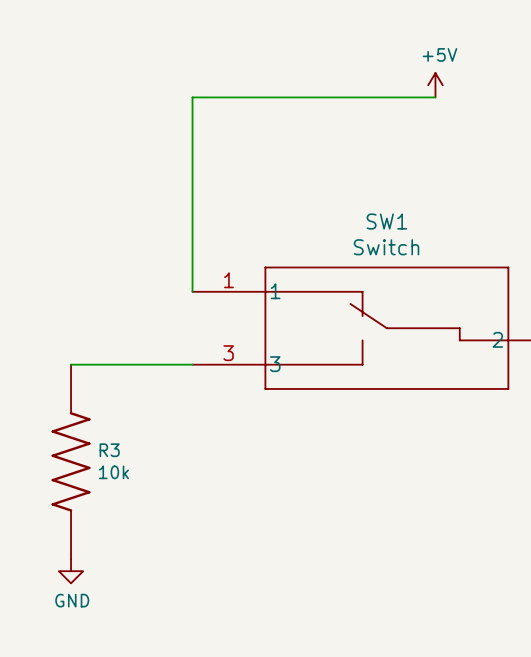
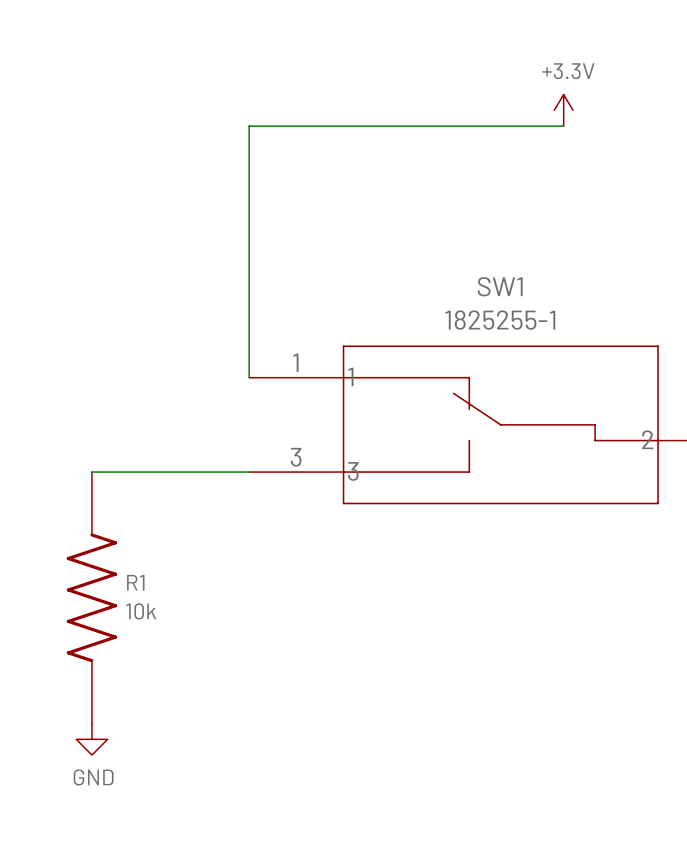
power symbol: +5V (435, 85) -> +3.3V (563, 110)
SW1 value: Switch (386, 247) -> 1825255-1 (500, 320)
R3 name: R3 (109, 450) -> R1 (135, 582)

